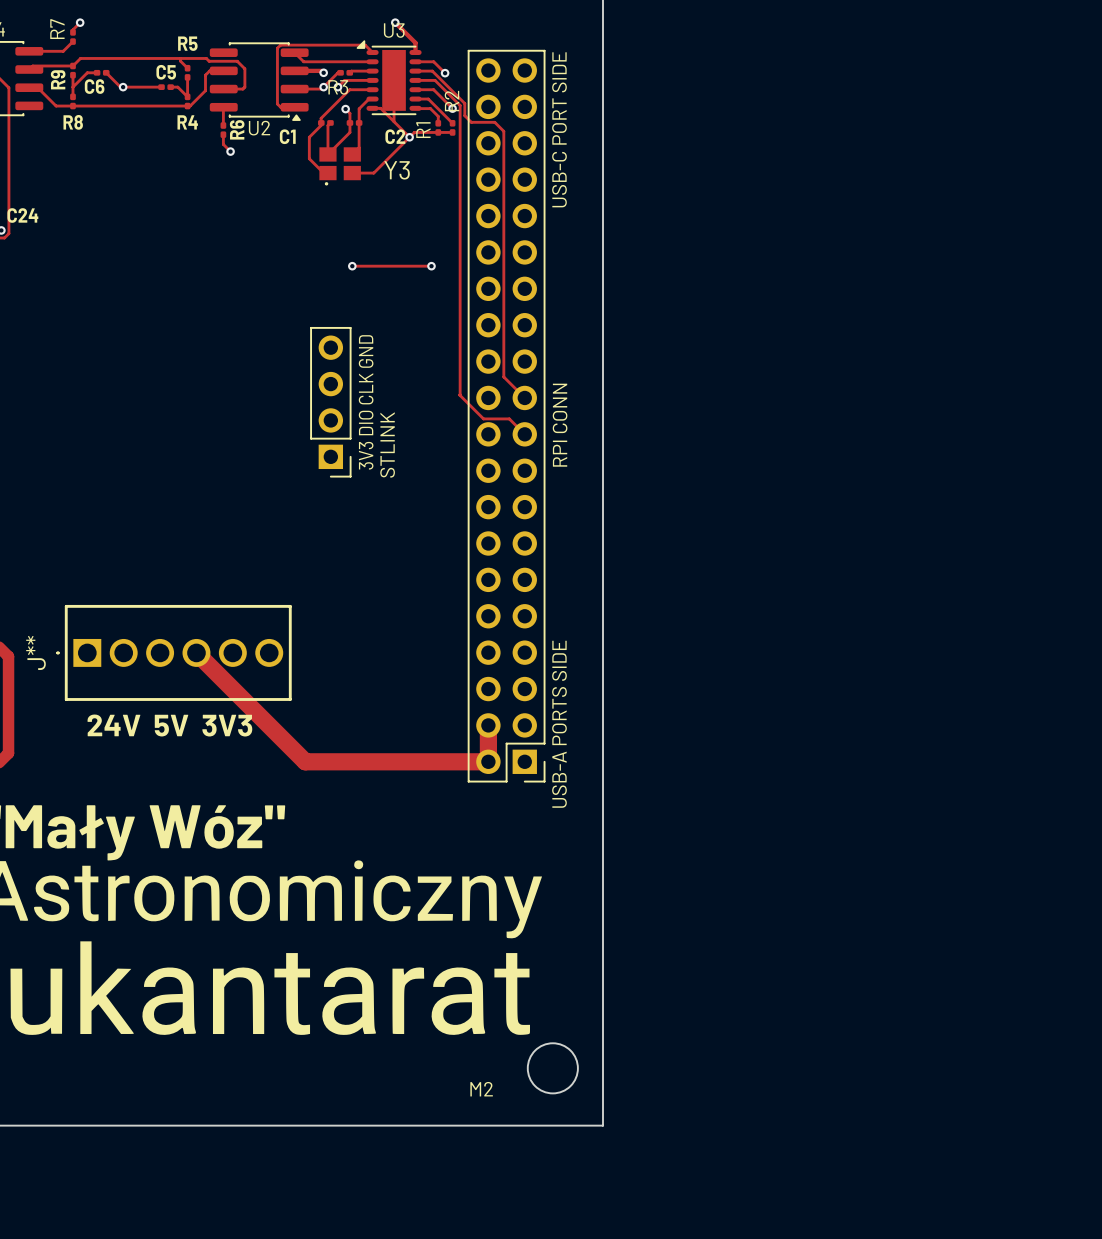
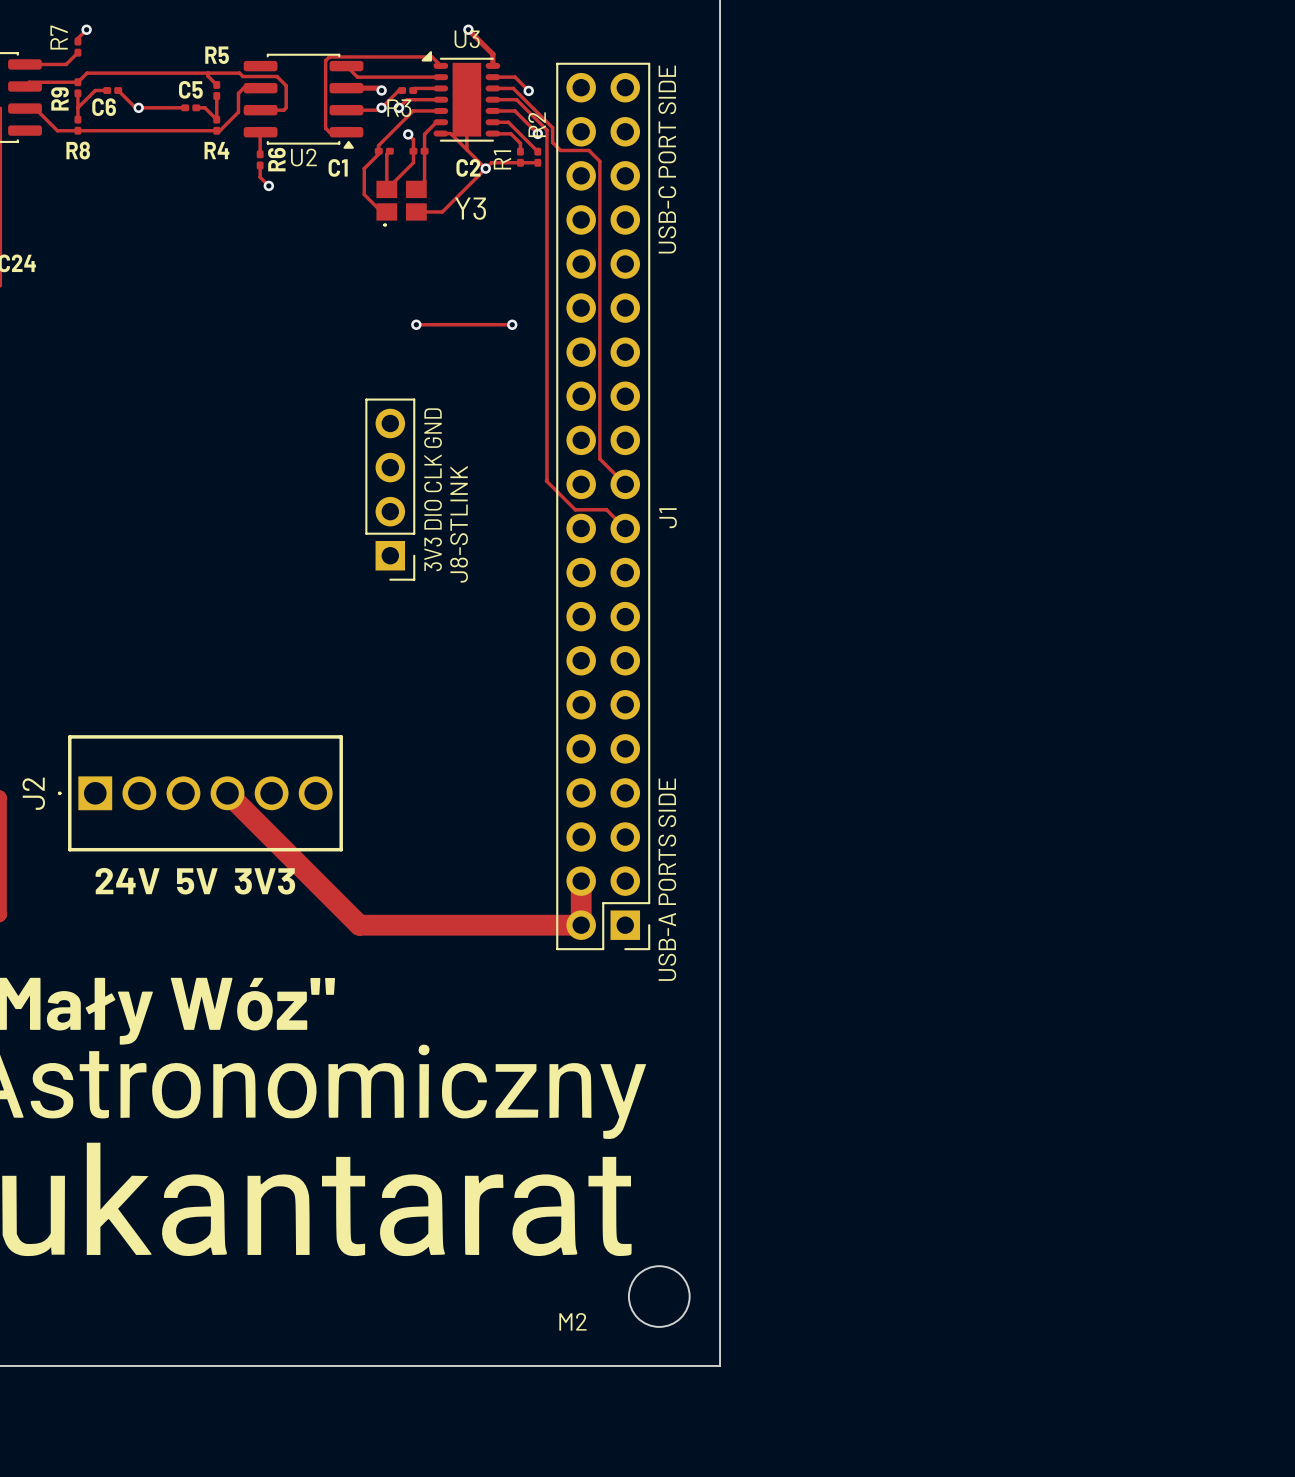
RPI CONN name: RPI CONN (560, 425) -> J1 (668, 518)
STLINK name: STLINK (387, 444) -> J8-STLINK (459, 524)
J** name: J** (36, 652) -> J2 (33, 793)

